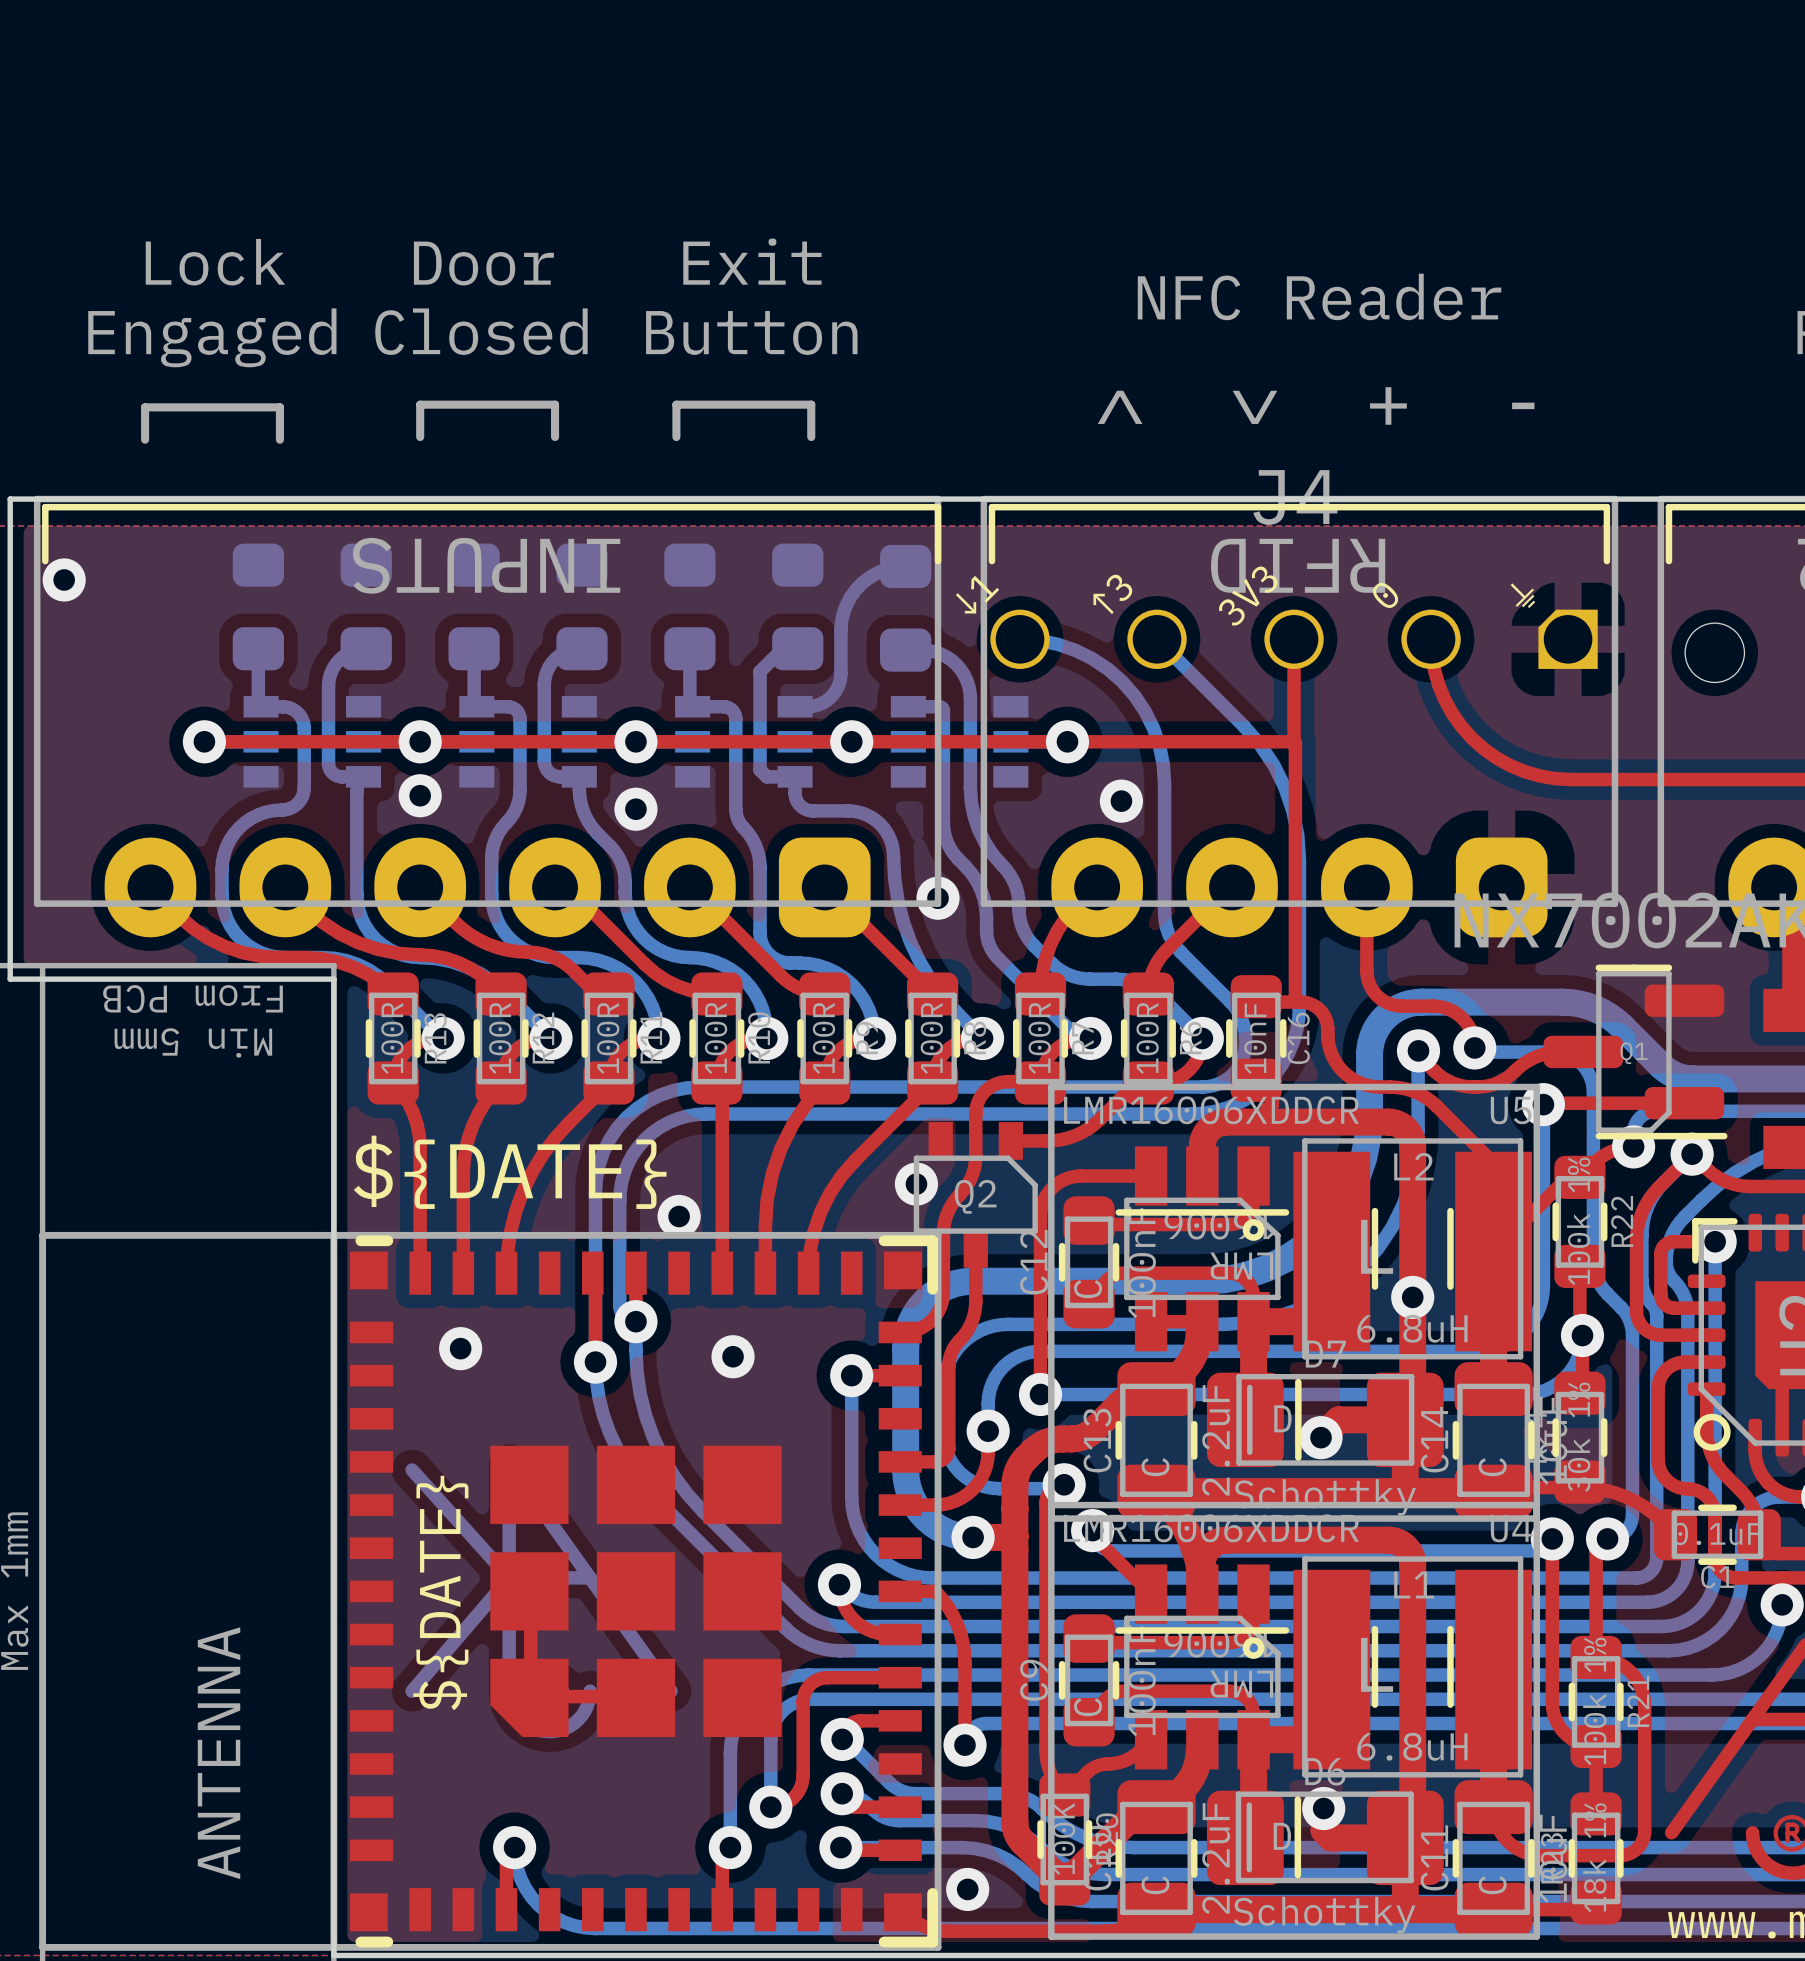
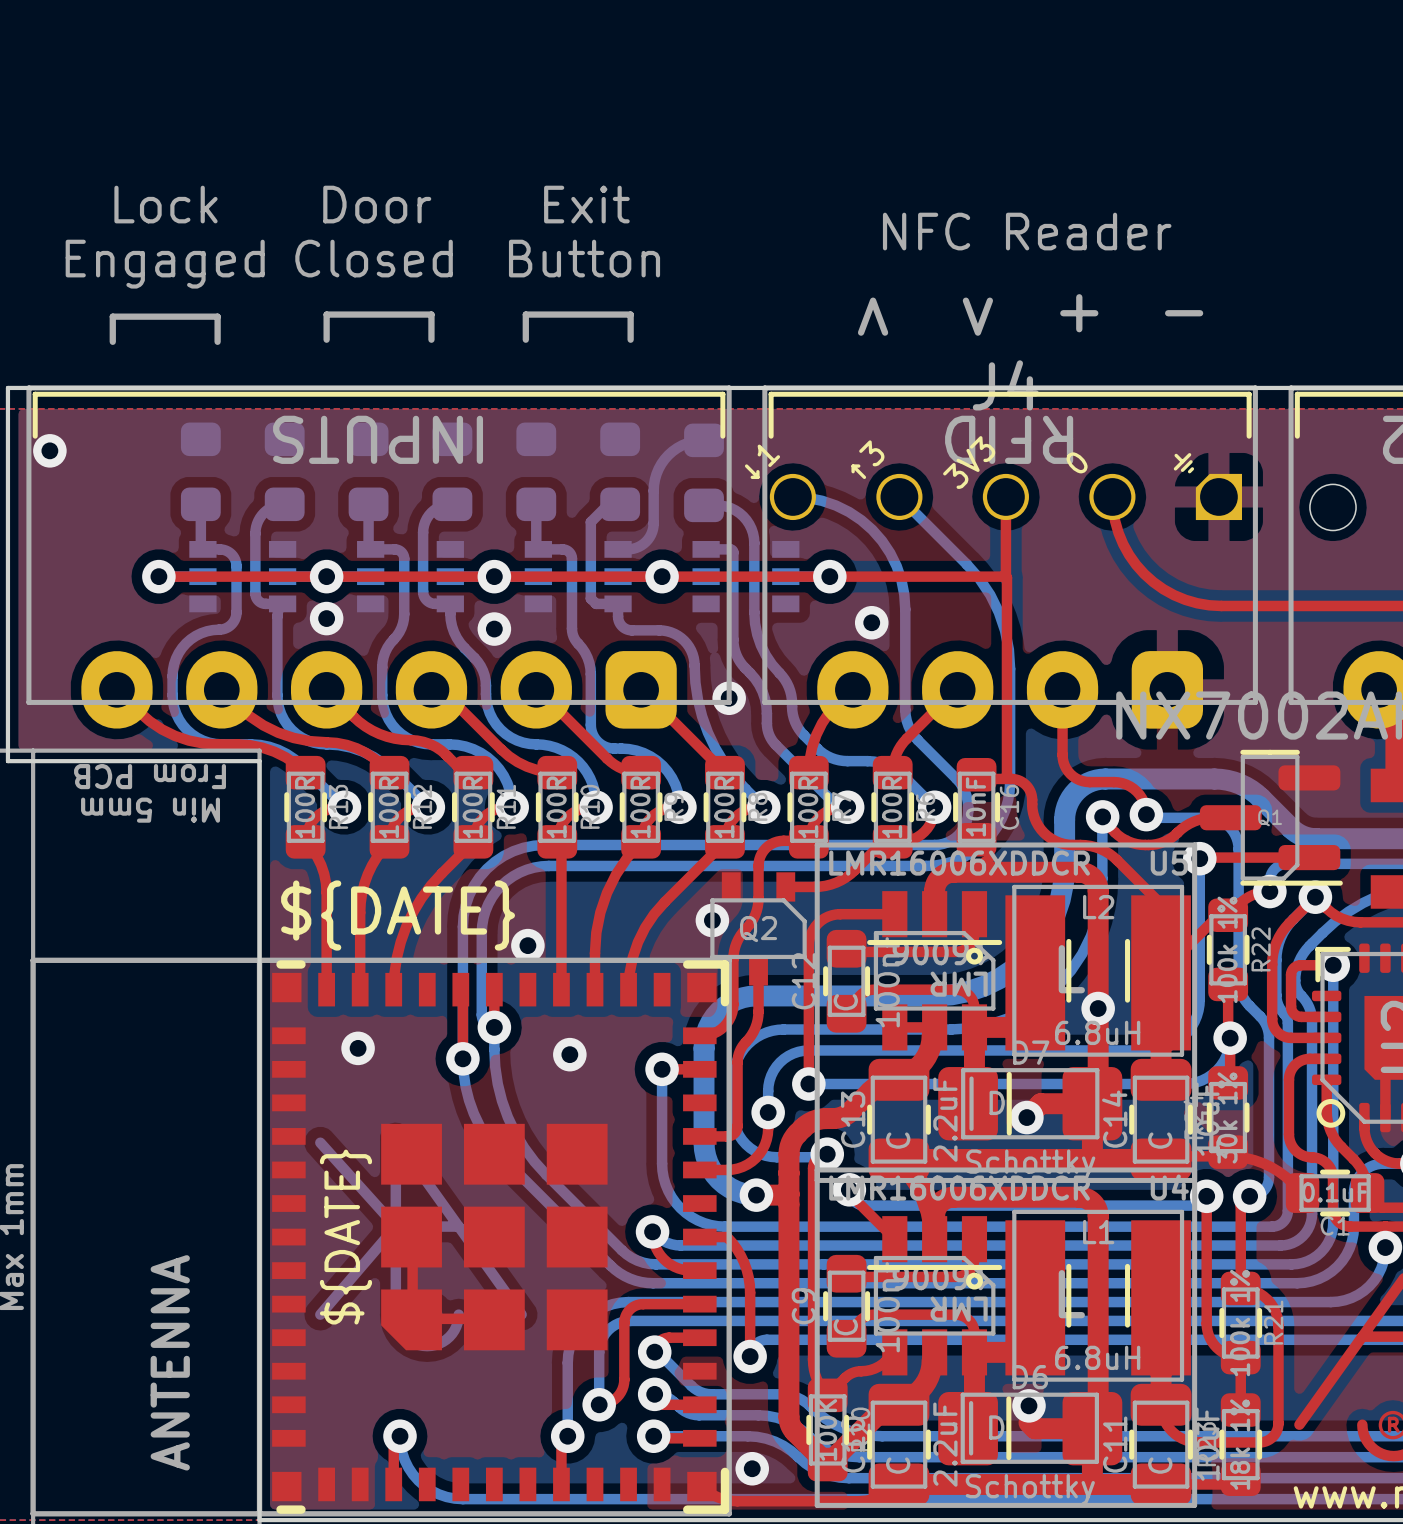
part footprint: [33, 495, 942, 938] -> [26, 385, 732, 729]

